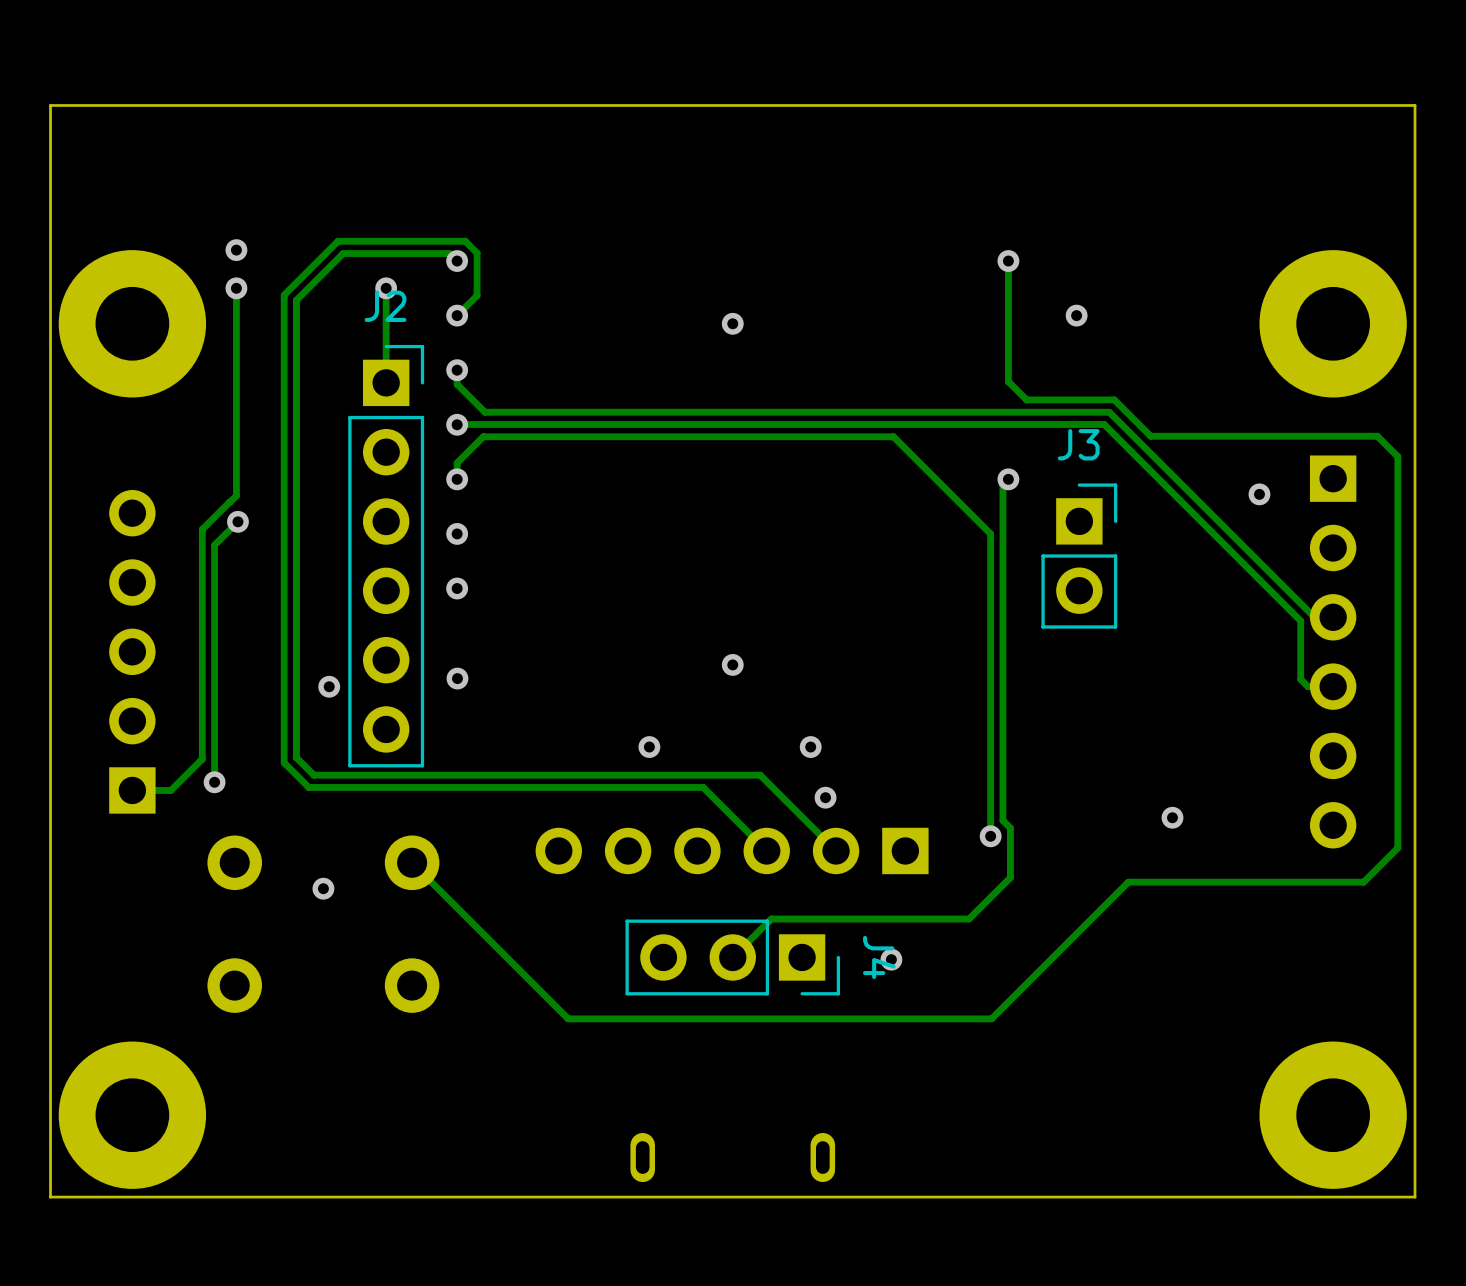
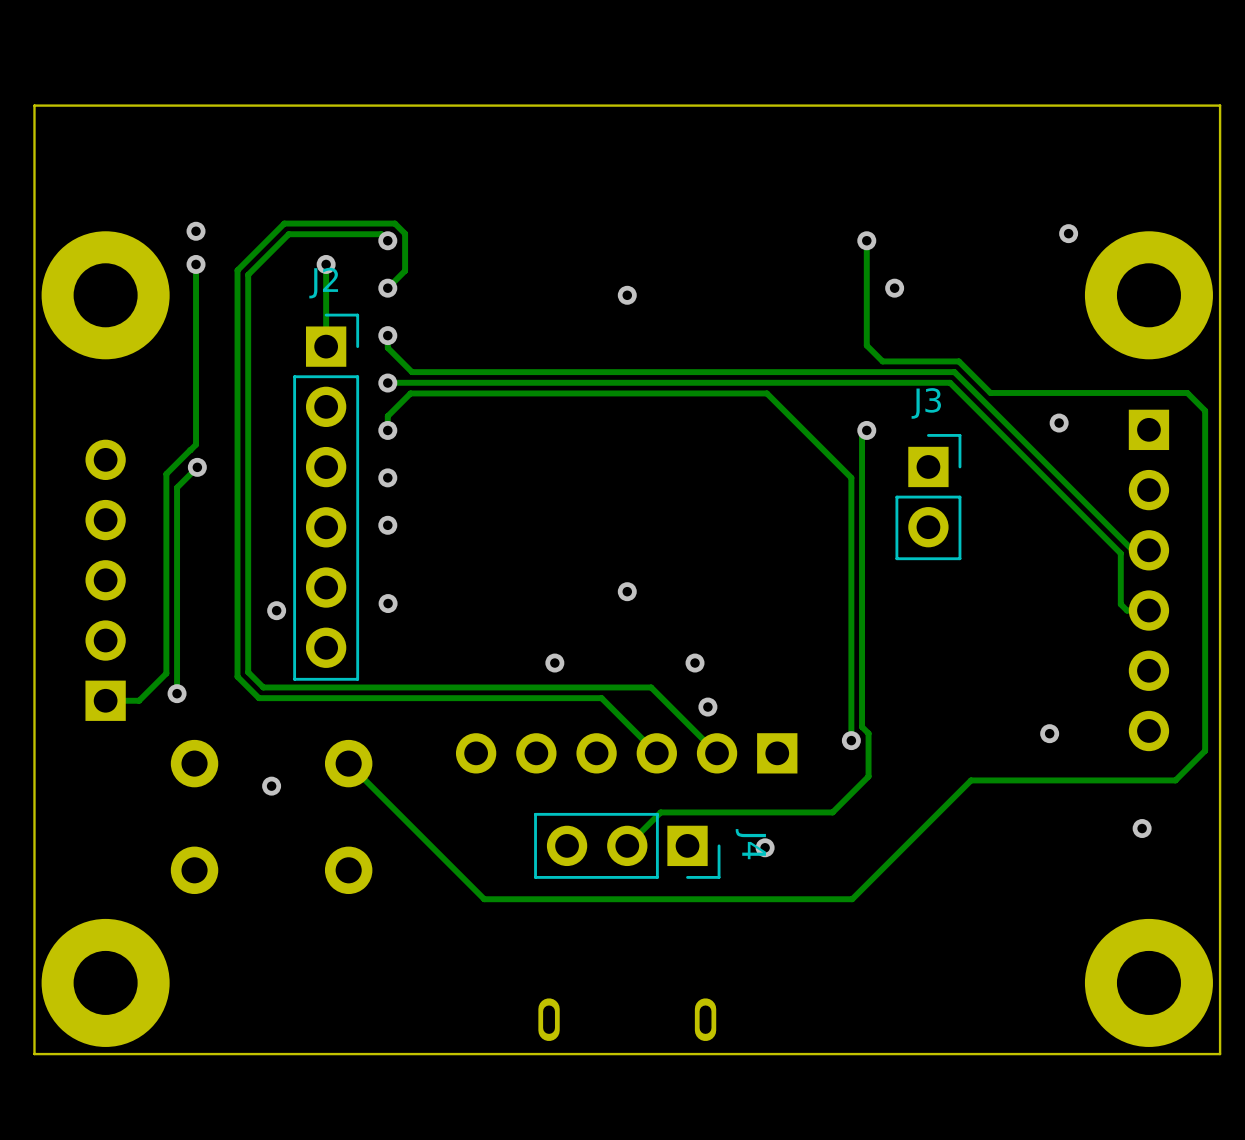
via: none -> (1068, 233)
via position: (1076, 315) -> (894, 288)
via position: (1259, 494) -> (1059, 423)
via position: (1172, 817) -> (1049, 733)
via: none -> (1142, 828)

